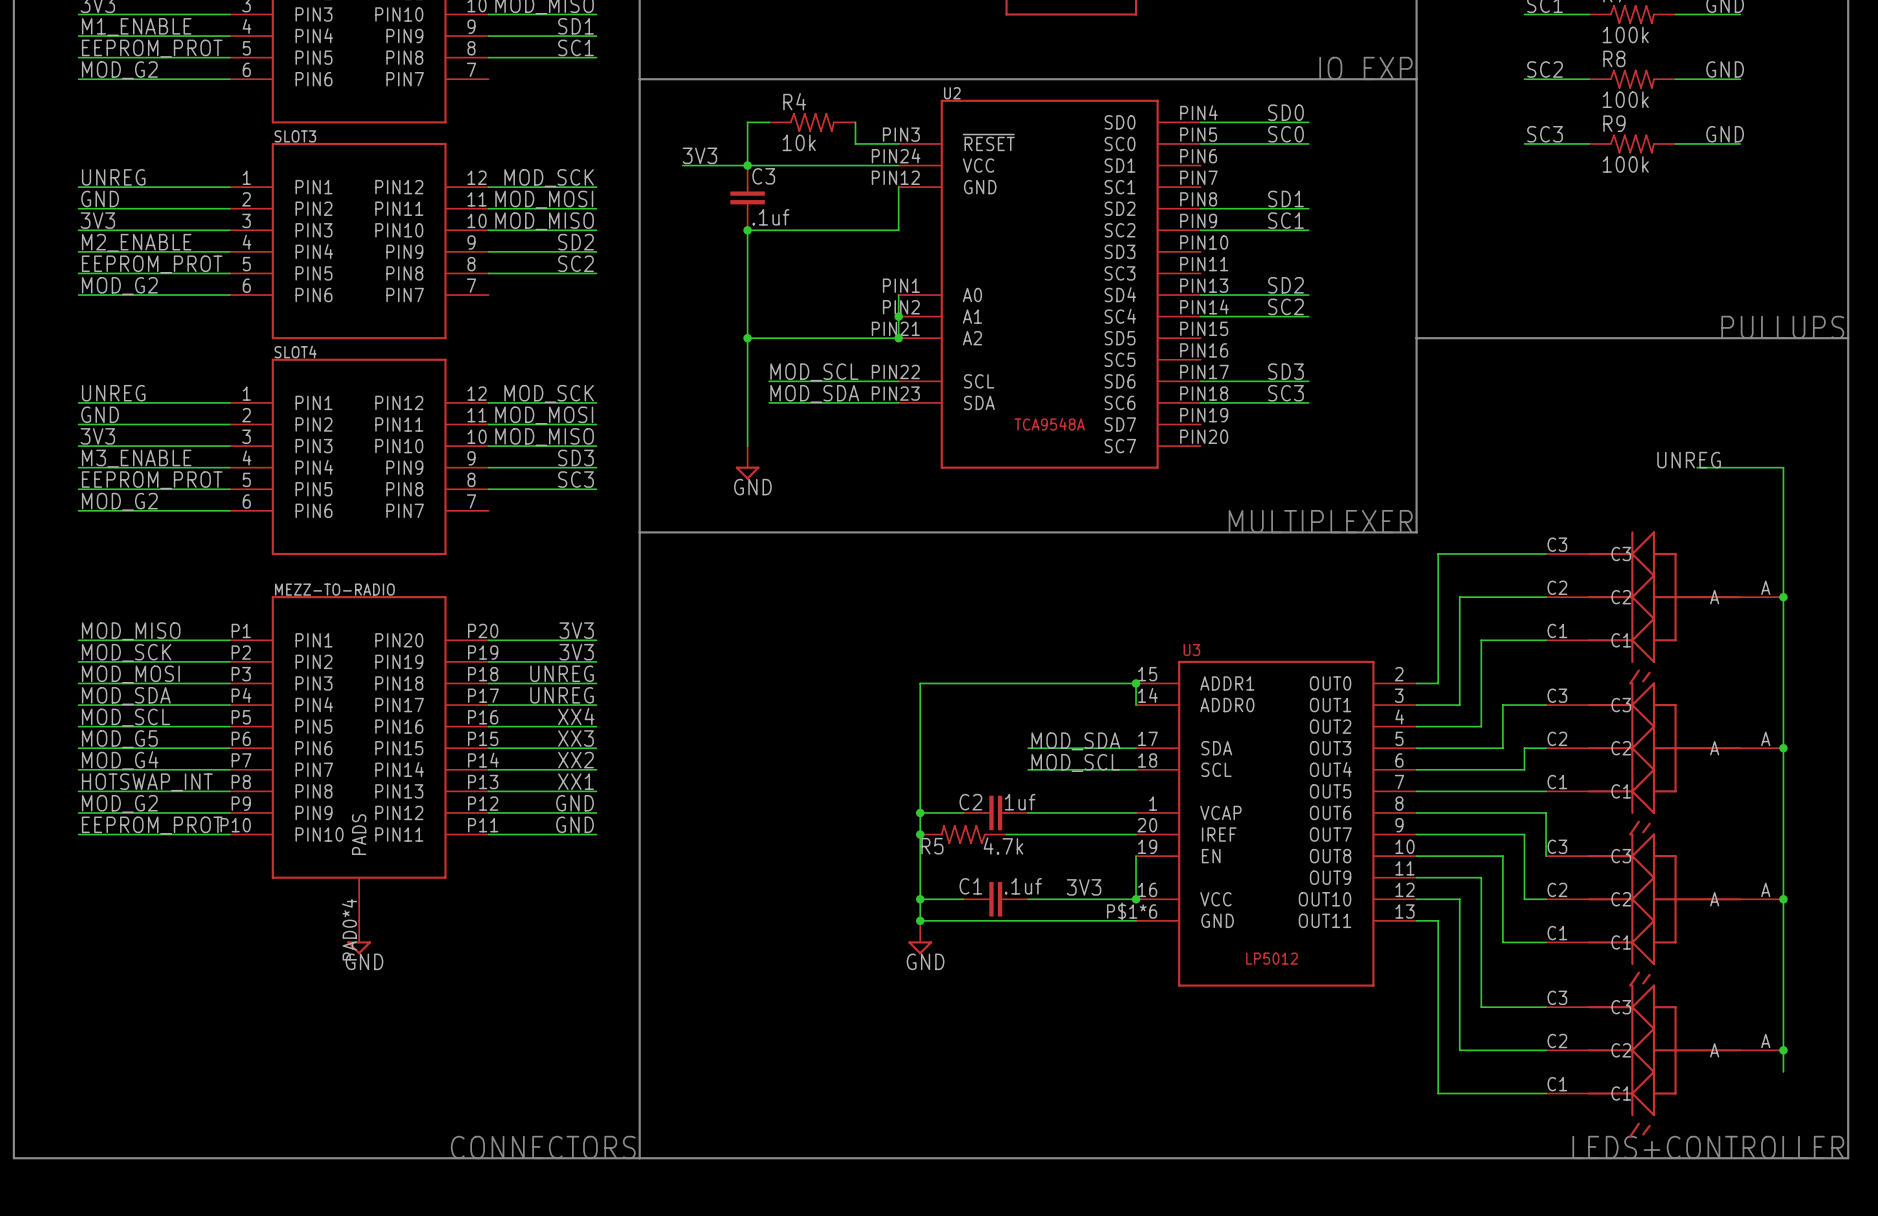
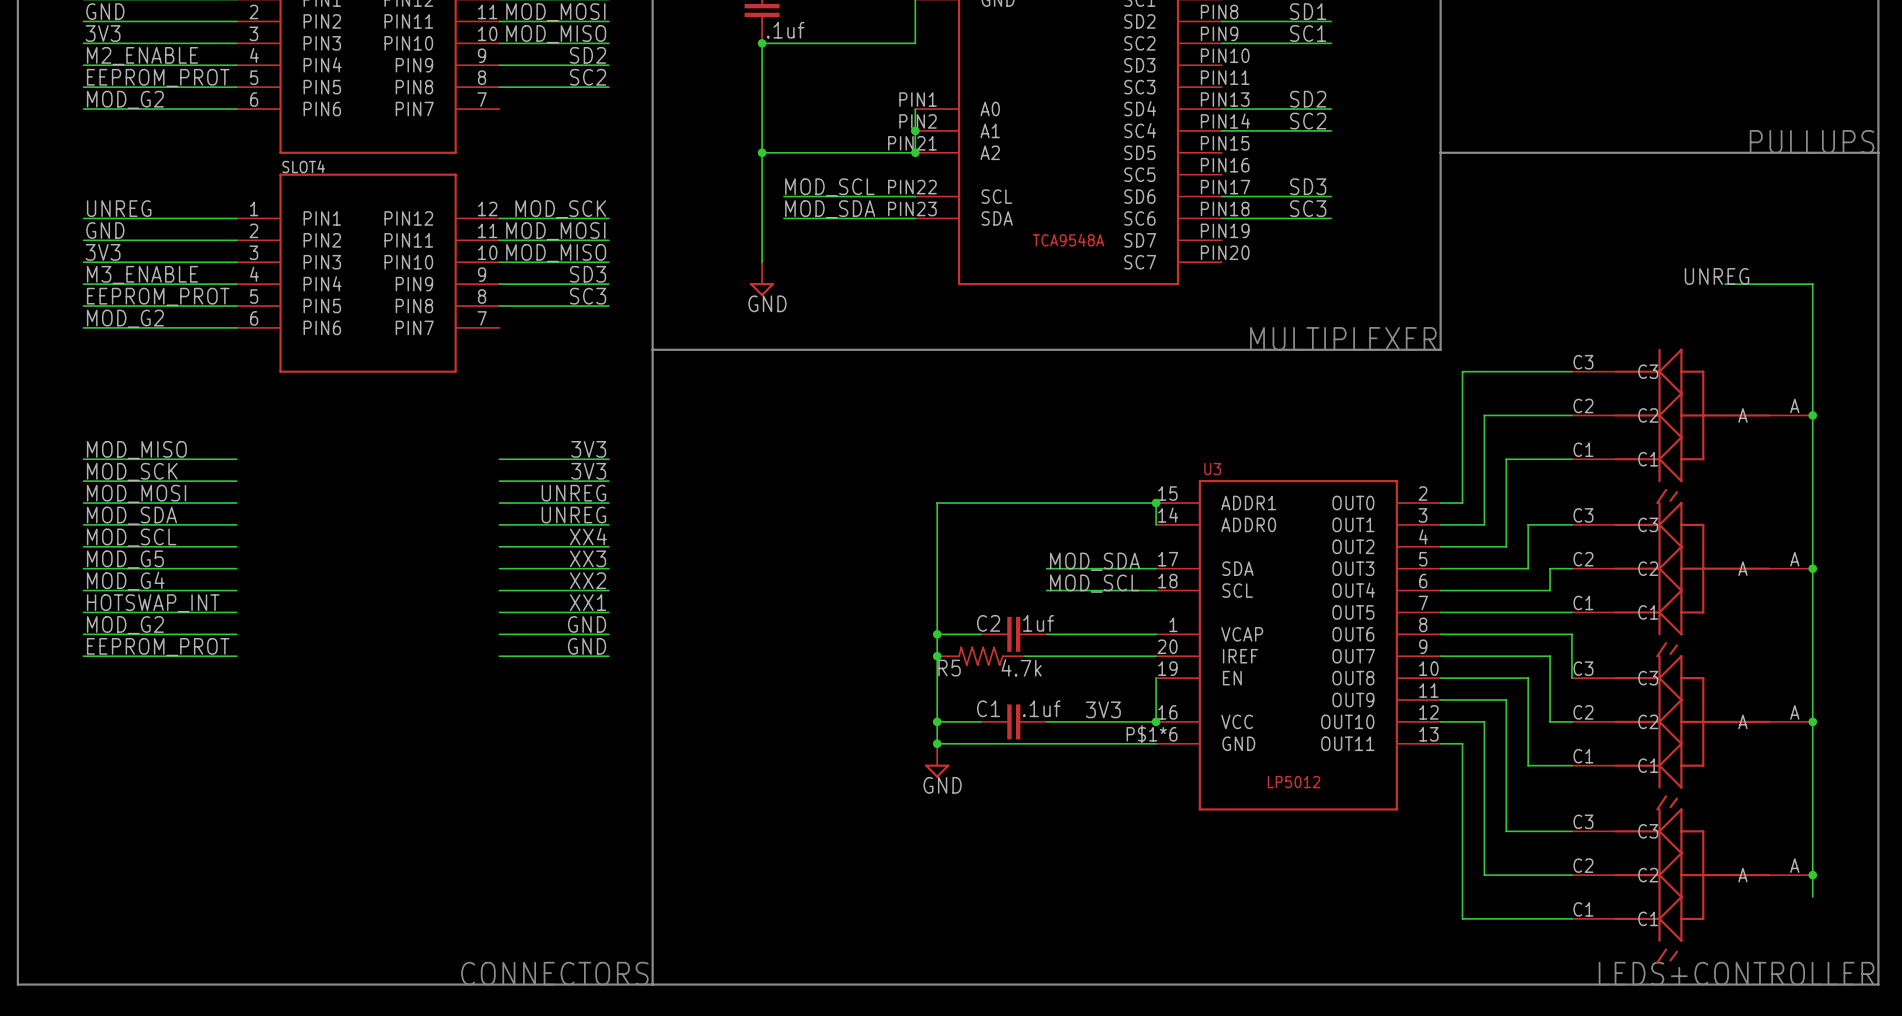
MEZZ-TO-RADIO: (359, 758) -> none
power symbol: GND (359, 937) -> none

